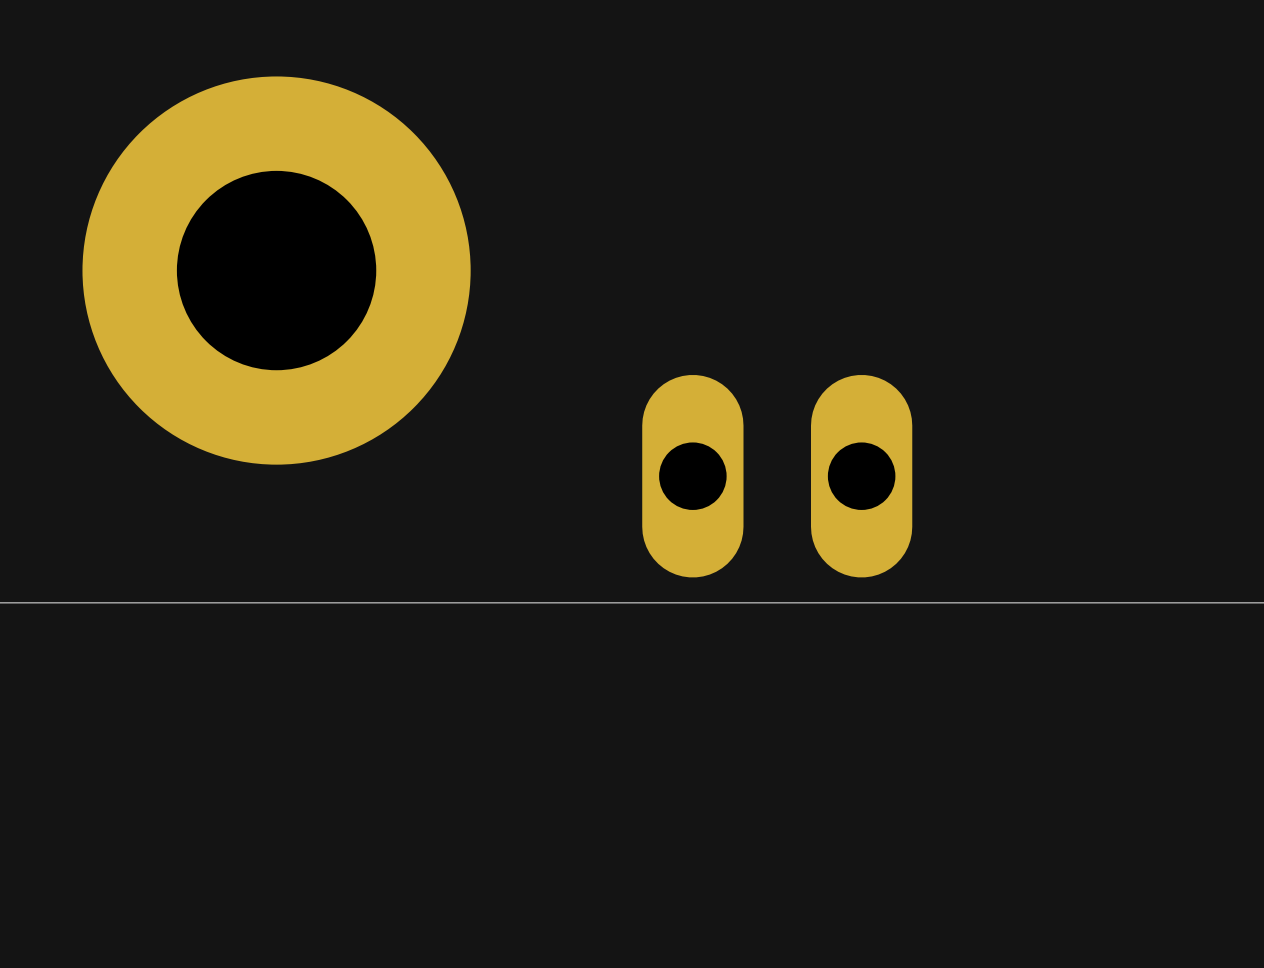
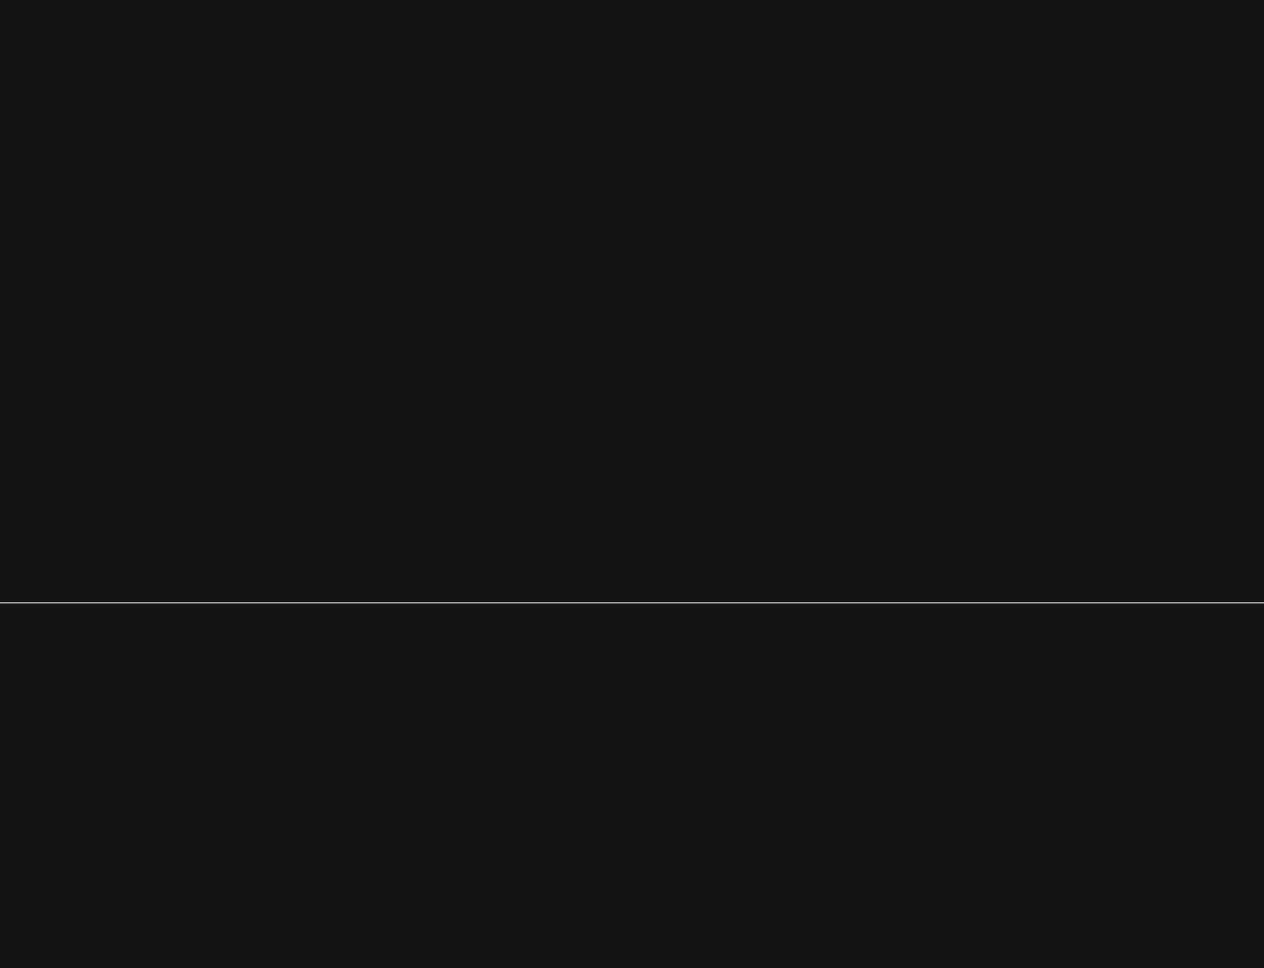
part: (276, 270) -> none
part: (777, 476) -> none

